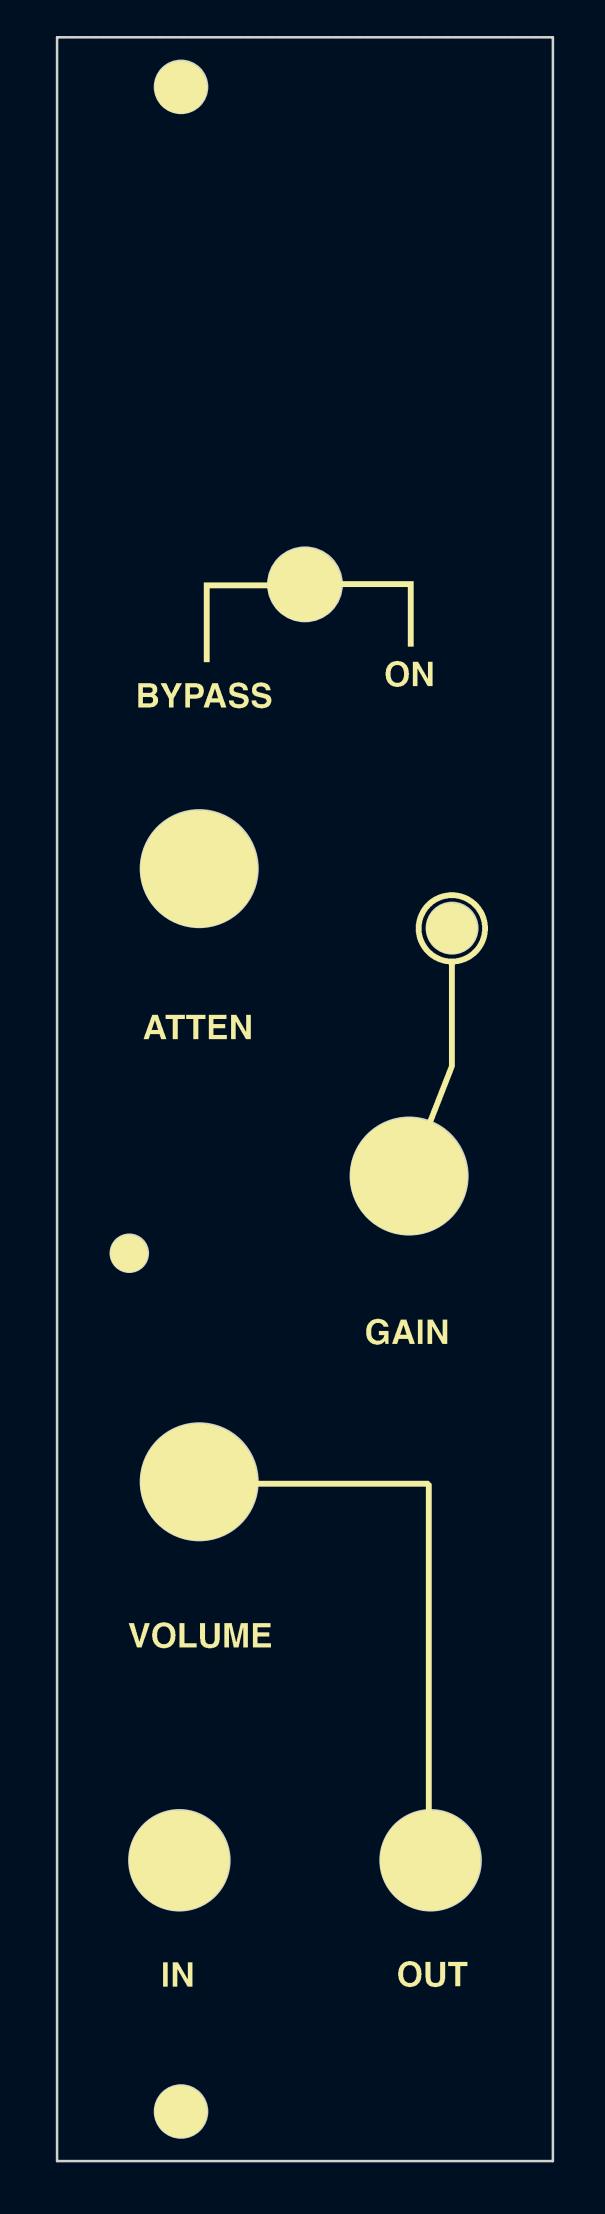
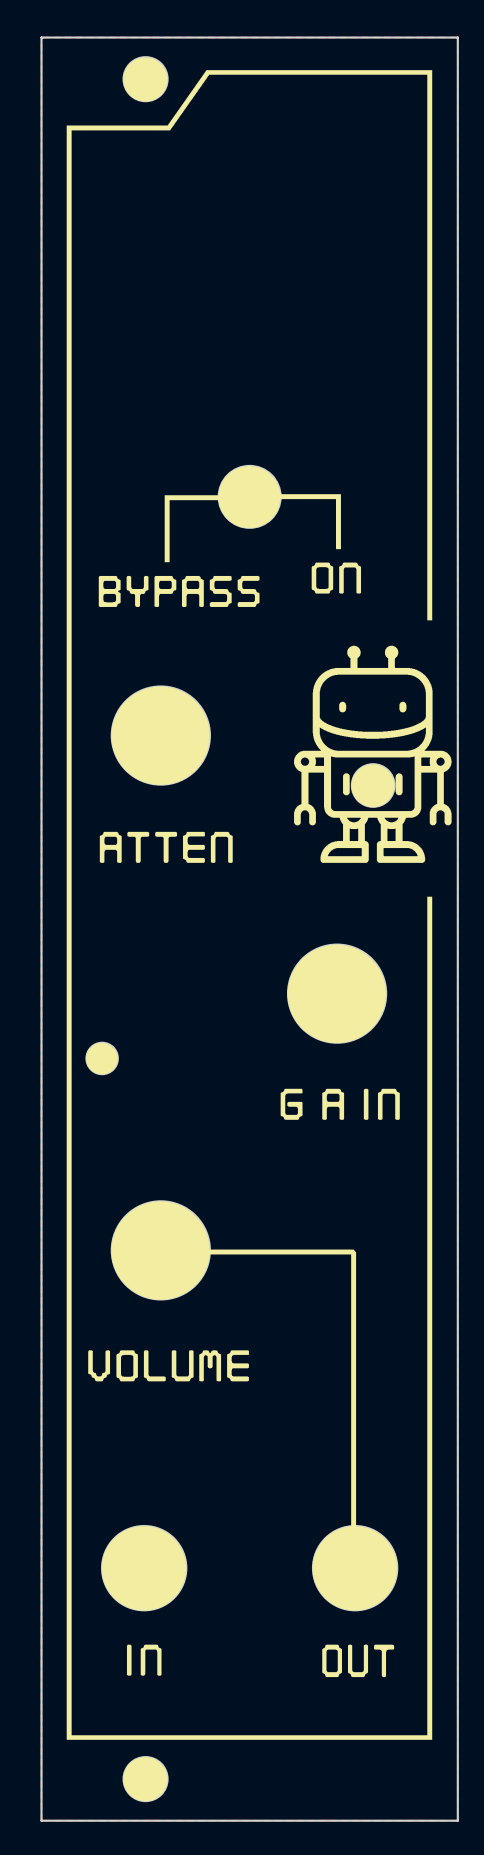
drawing: none -> [66, 57, 452, 1802]
drawing: [110, 61, 488, 2138] -> none

